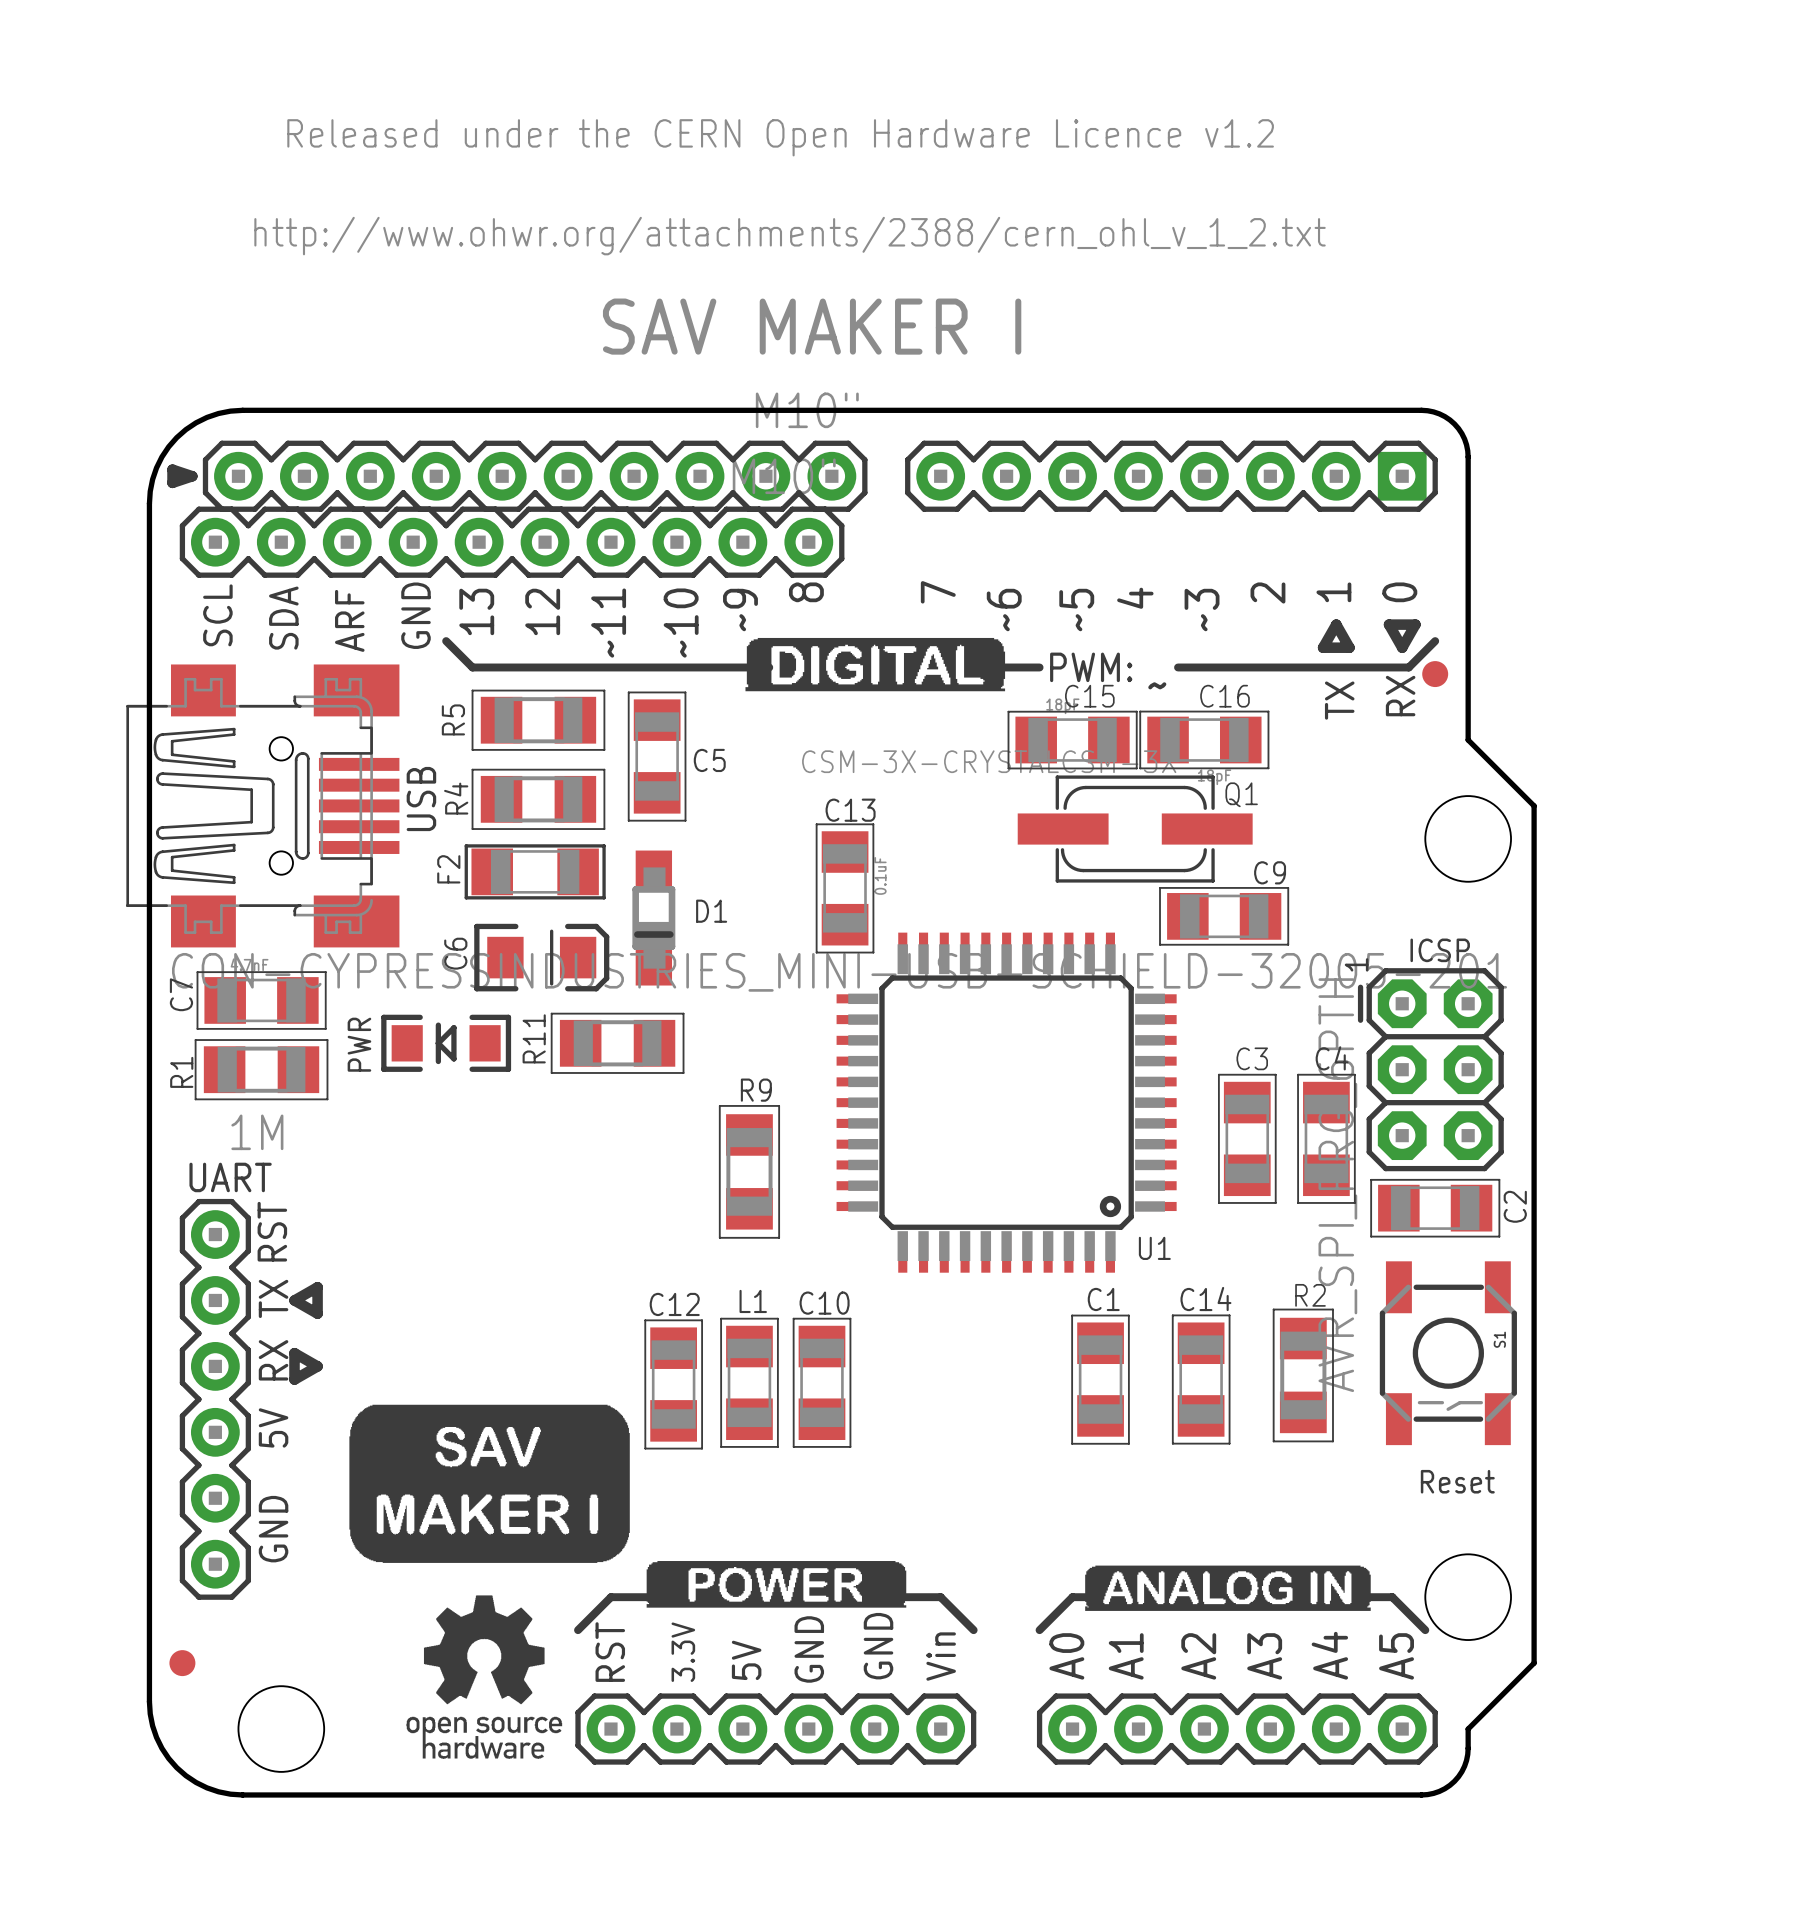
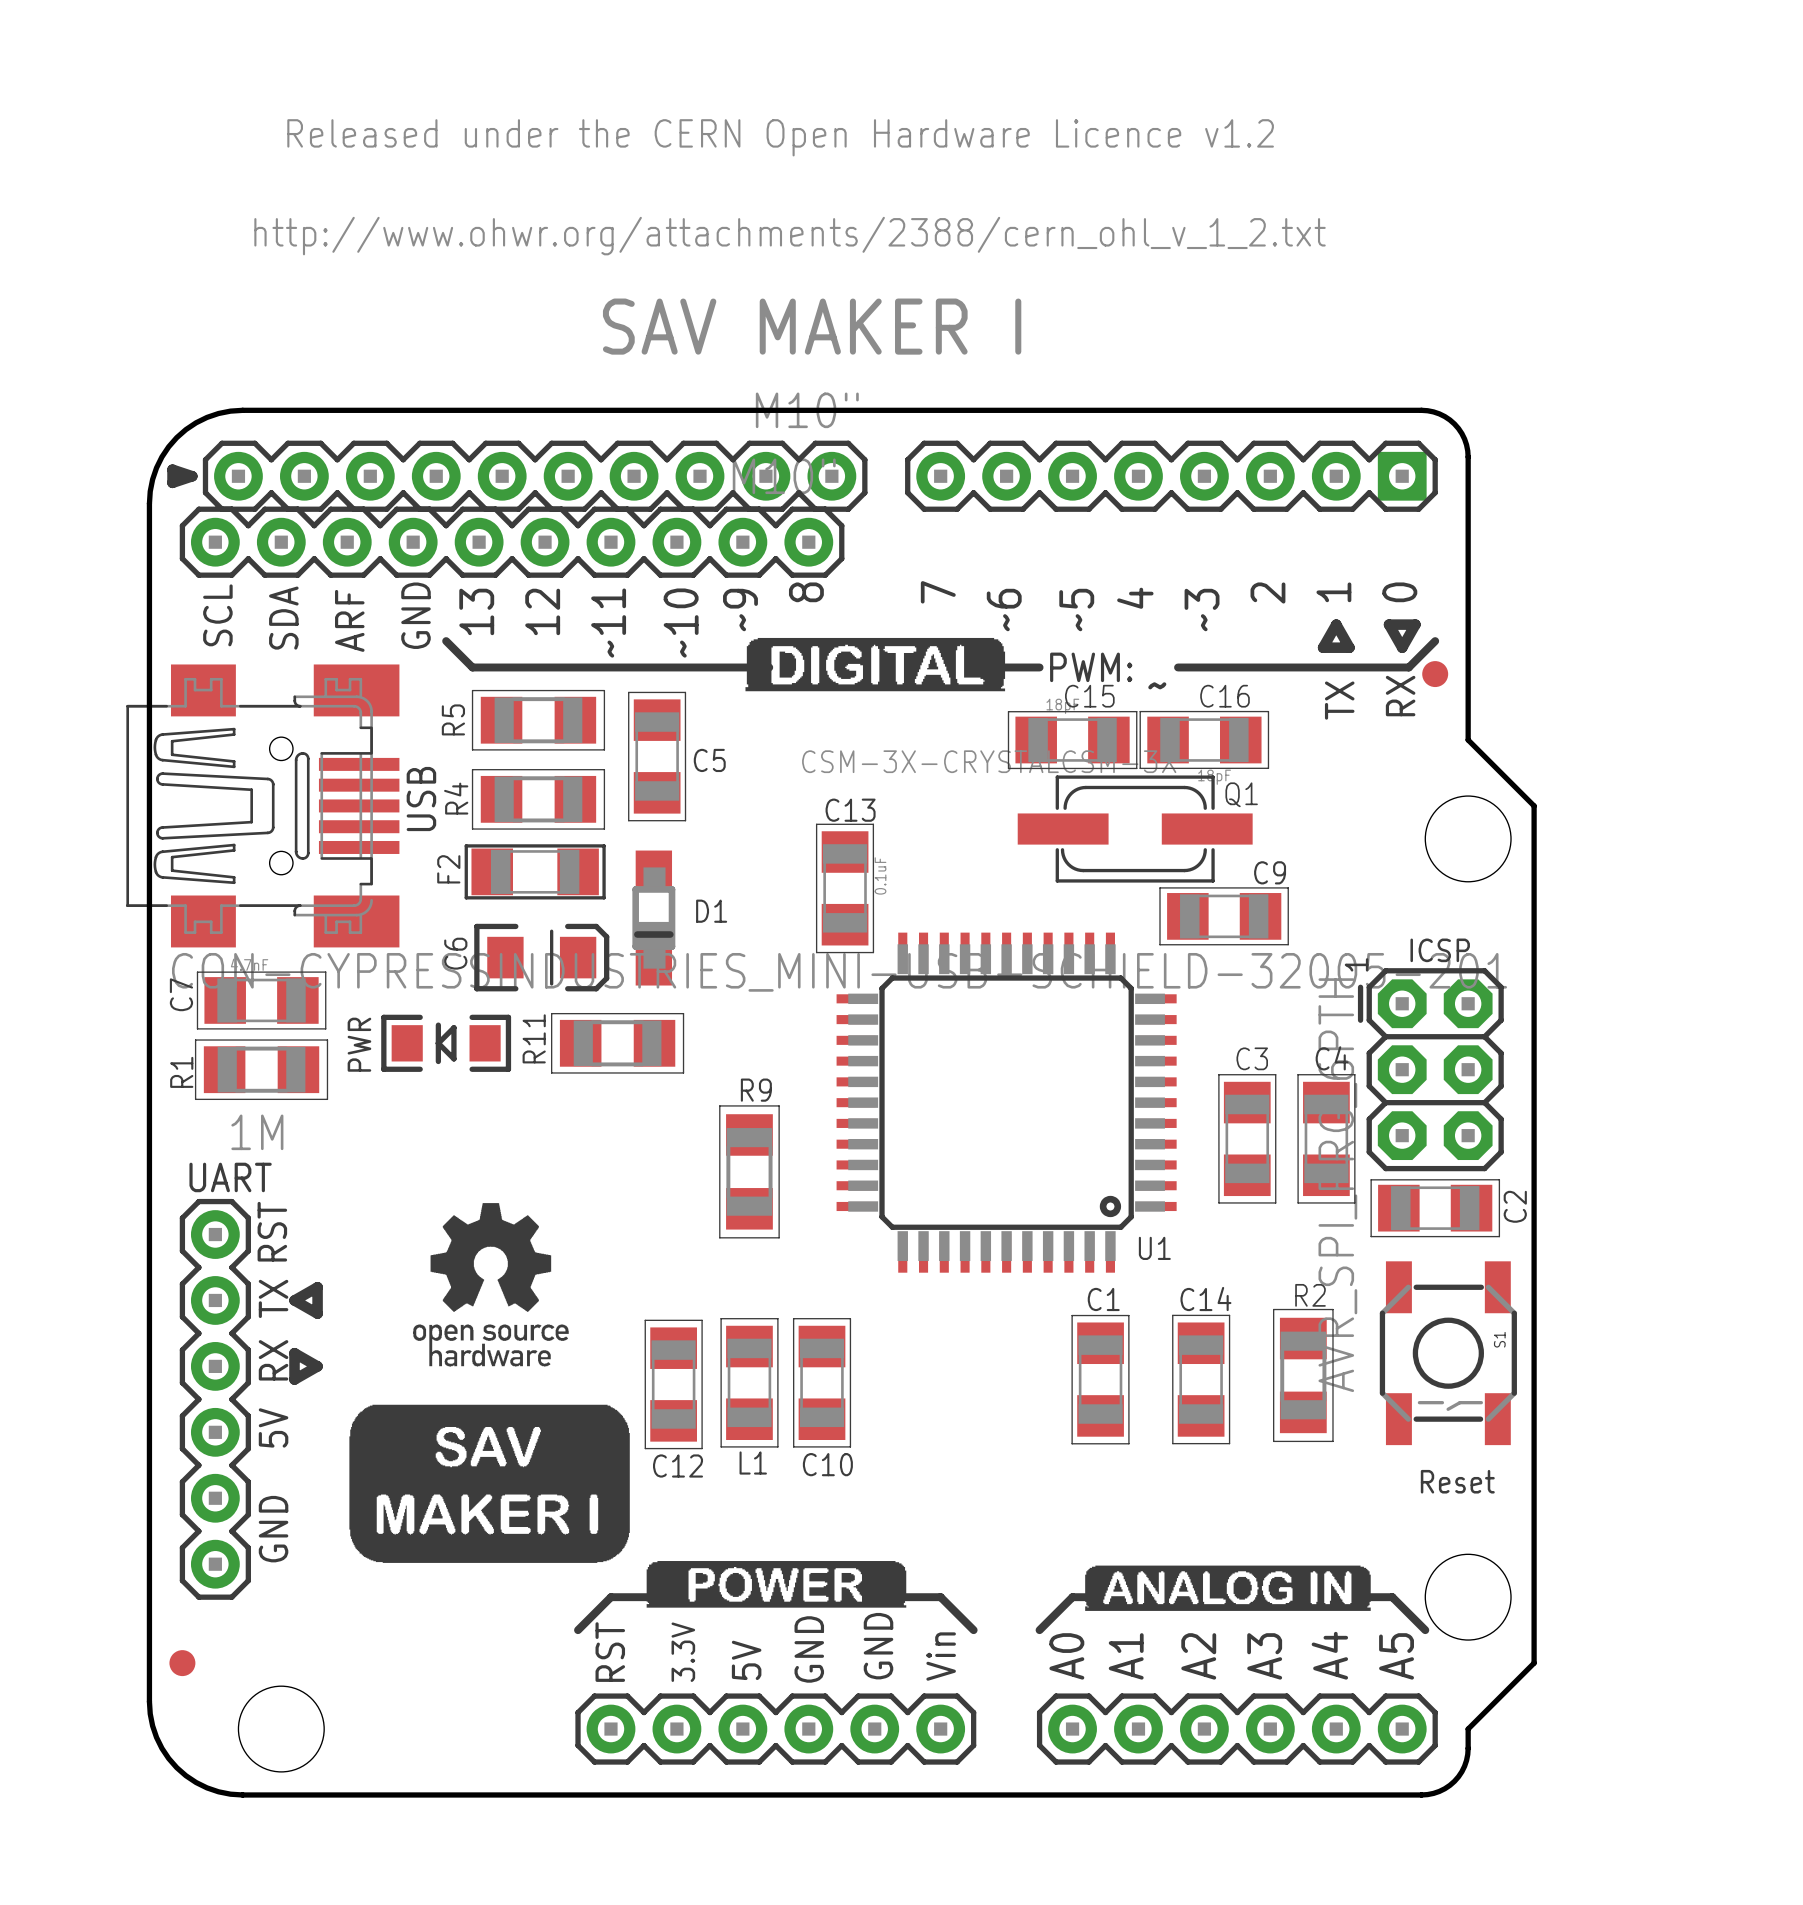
L1 name position: L1 (753, 1301) -> L1 (753, 1462)
C10 name position: C10 (824, 1303) -> C10 (827, 1464)
C12 name position: C12 (674, 1304) -> C12 (678, 1466)
drawing position: (484, 1677) -> (490, 1284)

